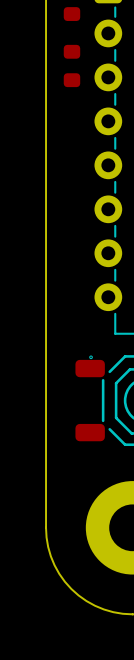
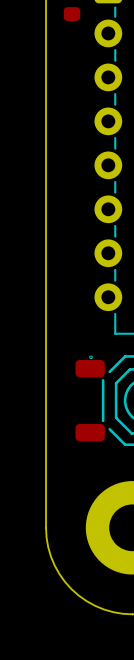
part: (71, 65) -> none

